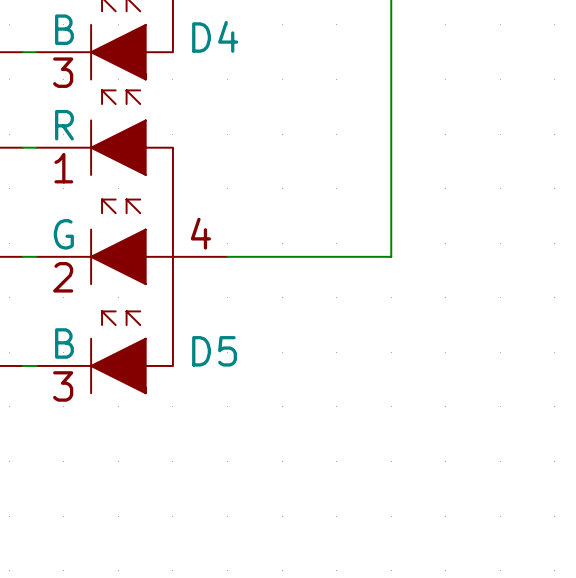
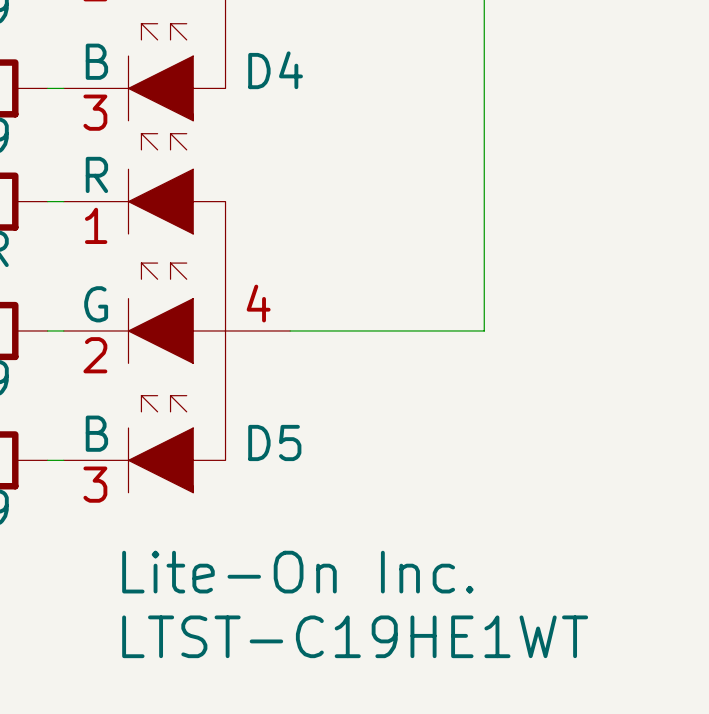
D5 text: none -> Lite-On Inc. (297, 572)
D5 text: none -> LTST-C19HE1WT (355, 636)

